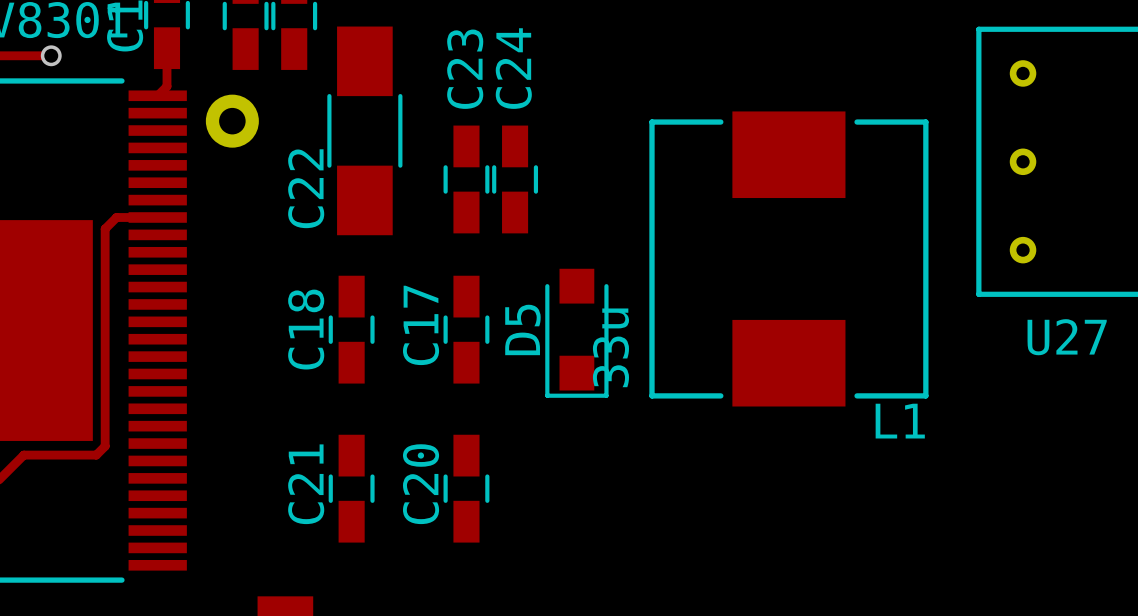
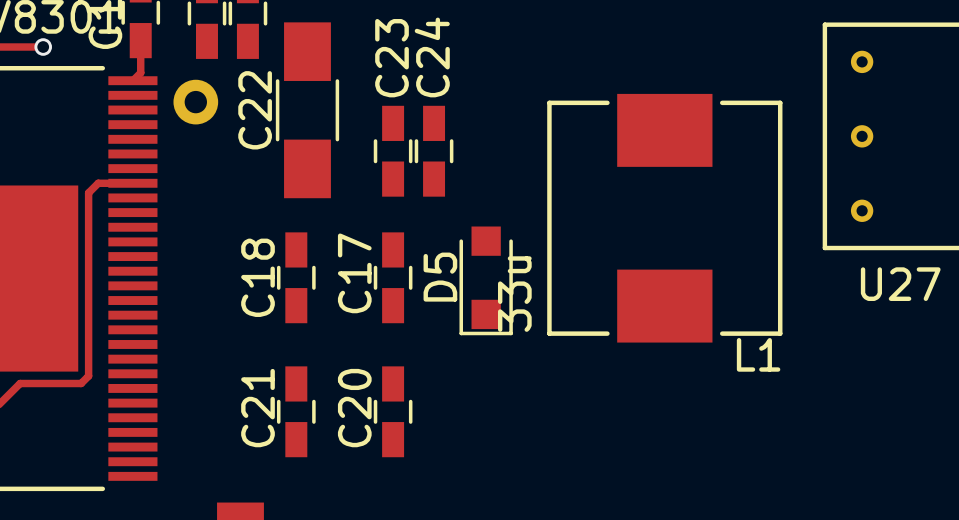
C22 name position: C22 (306, 188) -> C22 (255, 110)

